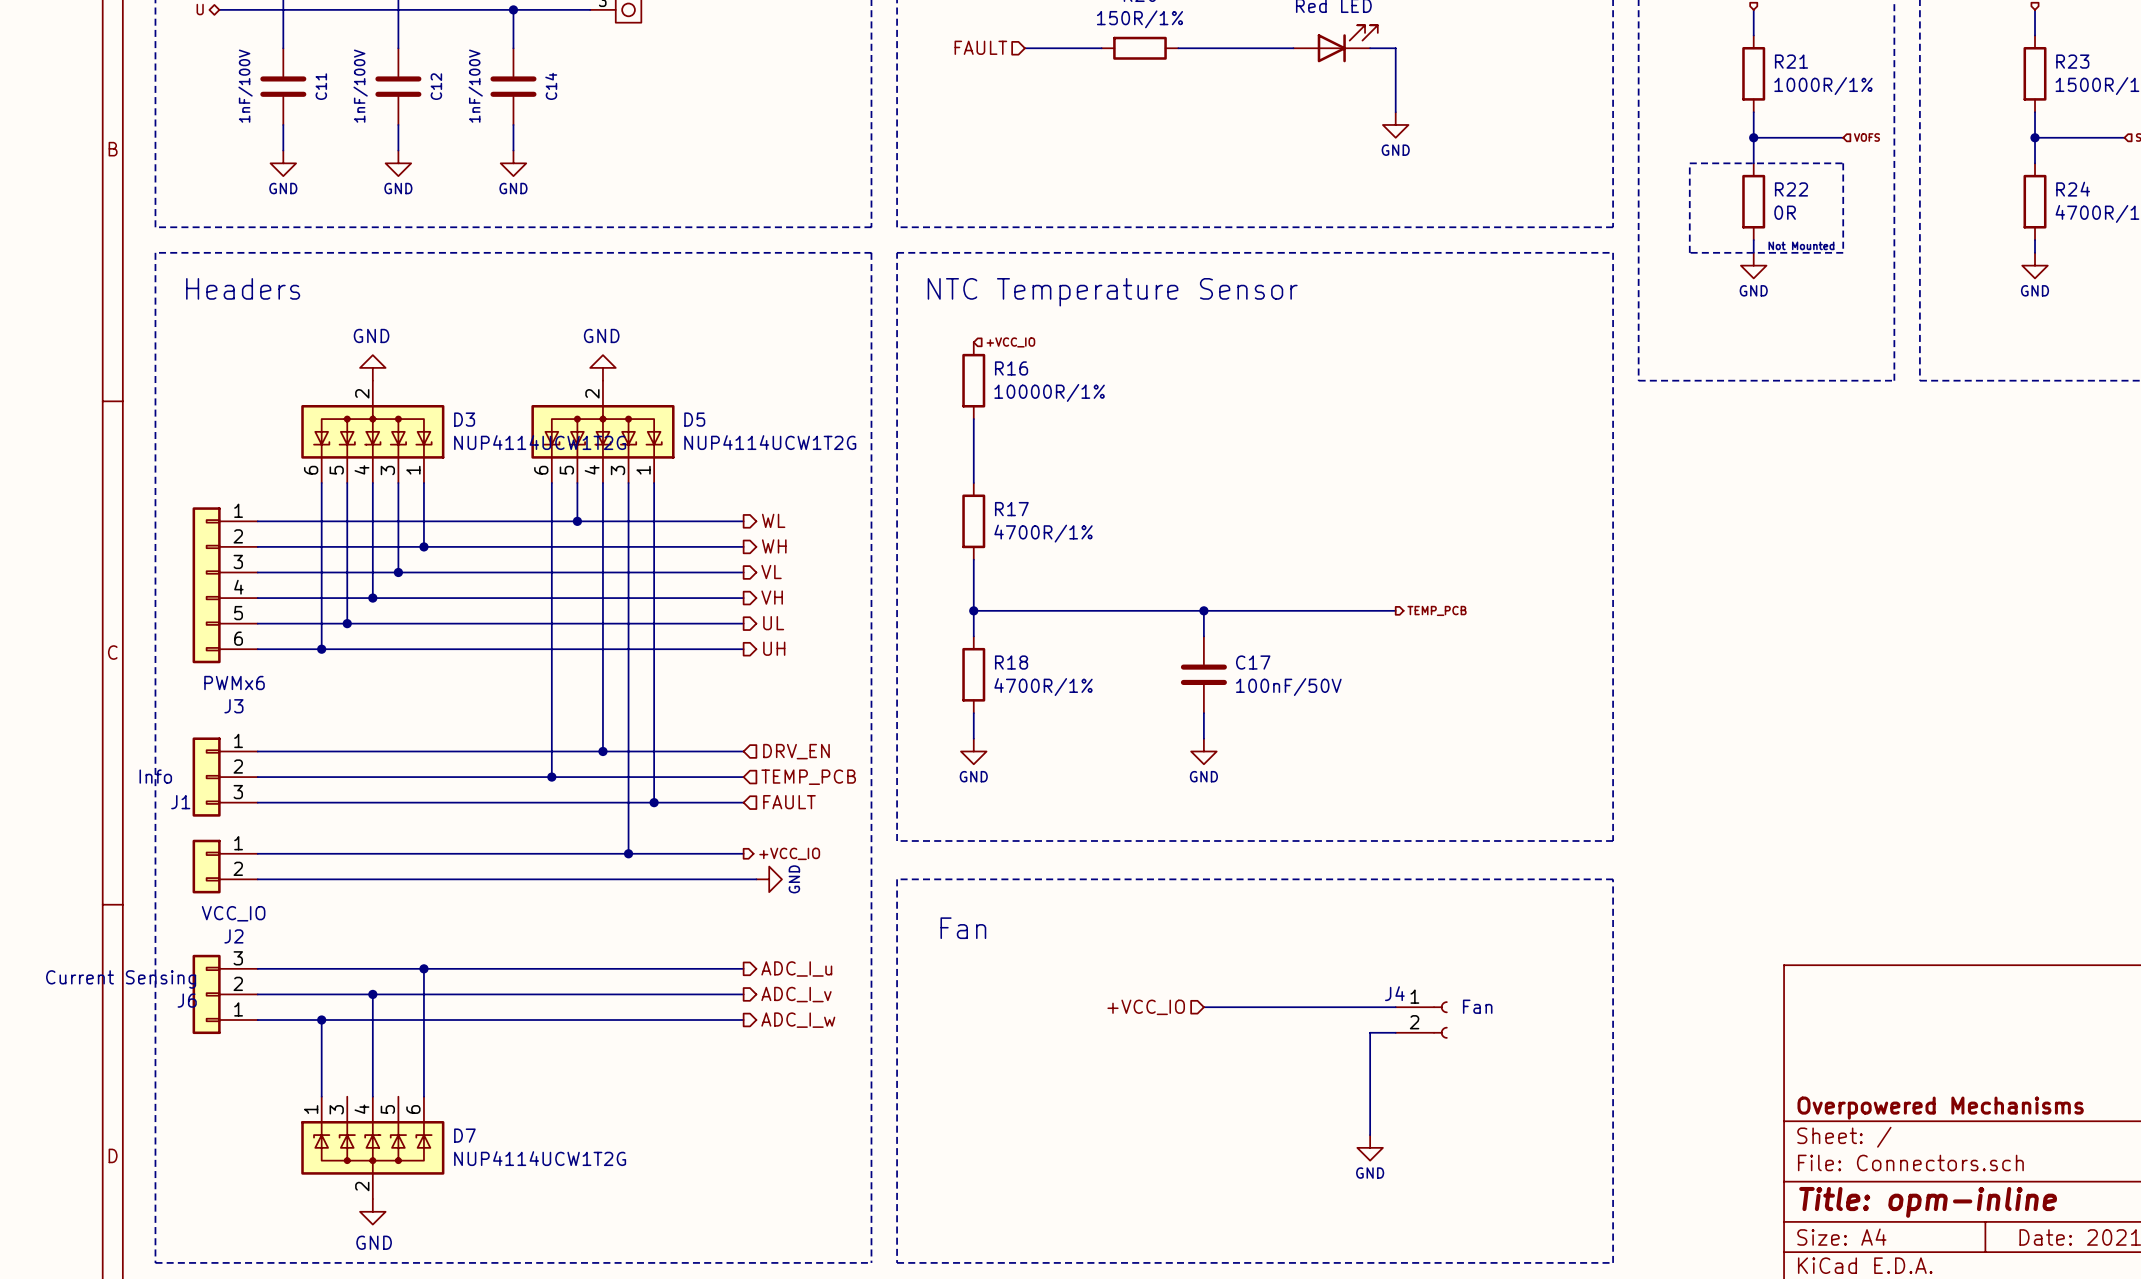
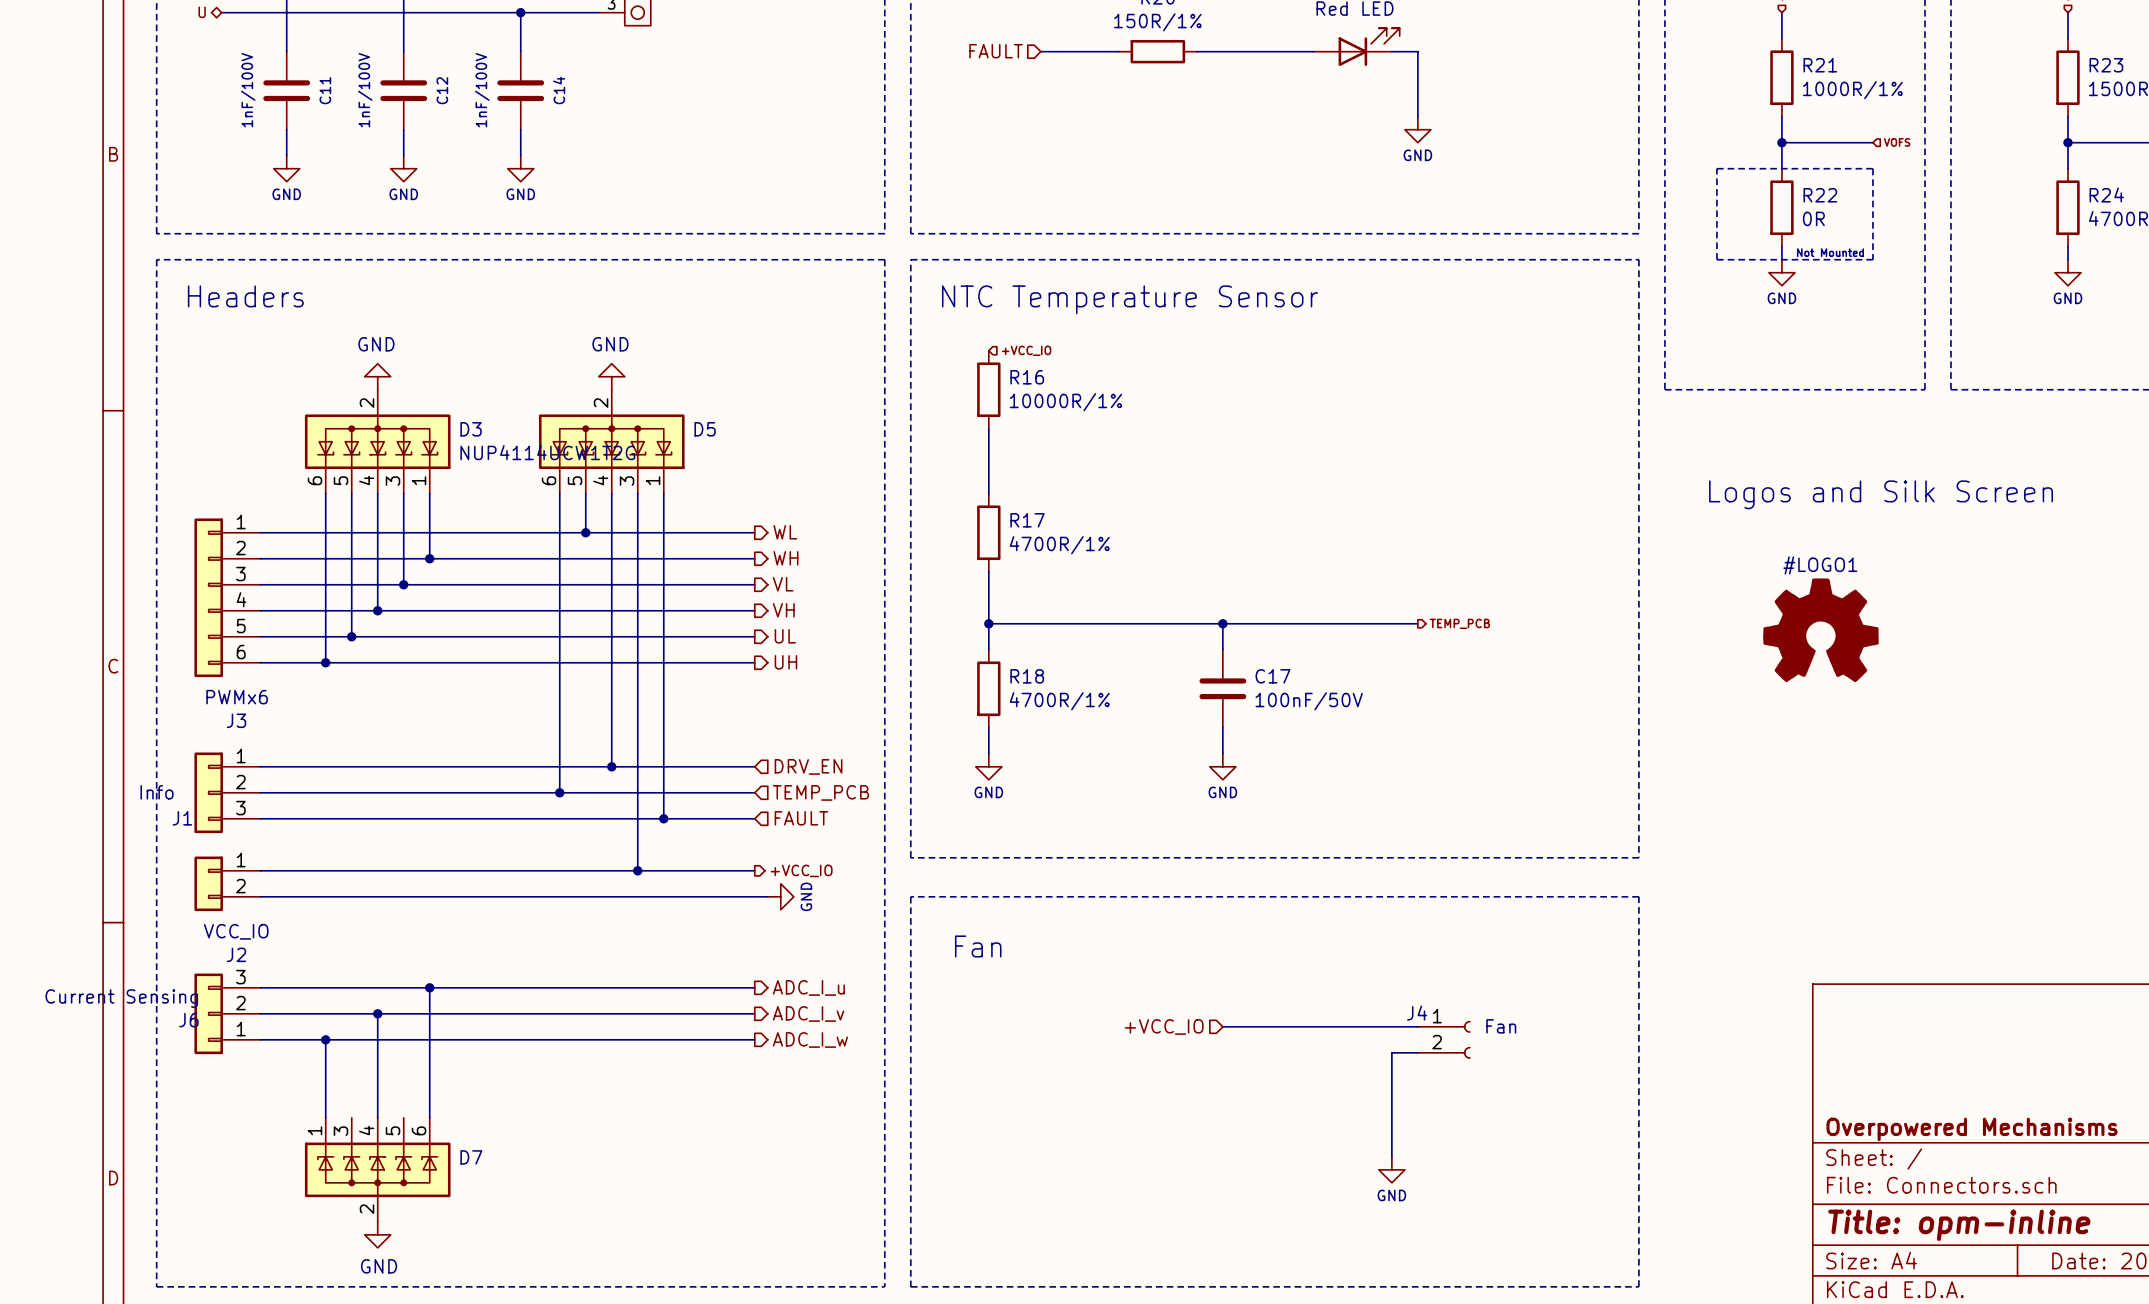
D5 value: NUP4114UCW1T2G (770, 442) -> none
text: none -> Logos and Silk Screen (1881, 494)
#LOGO1: none -> (1820, 630)
D7 value: NUP4114UCW1T2G (540, 1158) -> none

